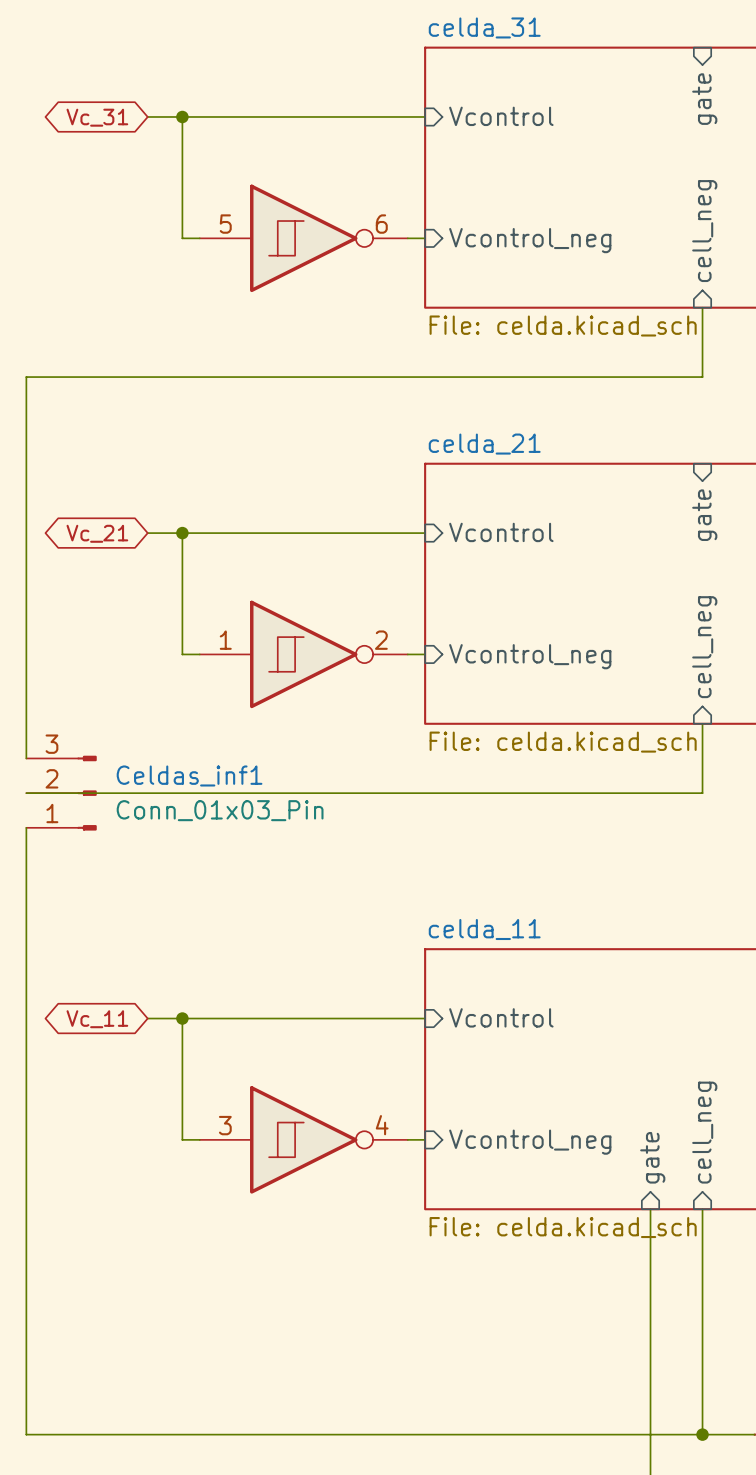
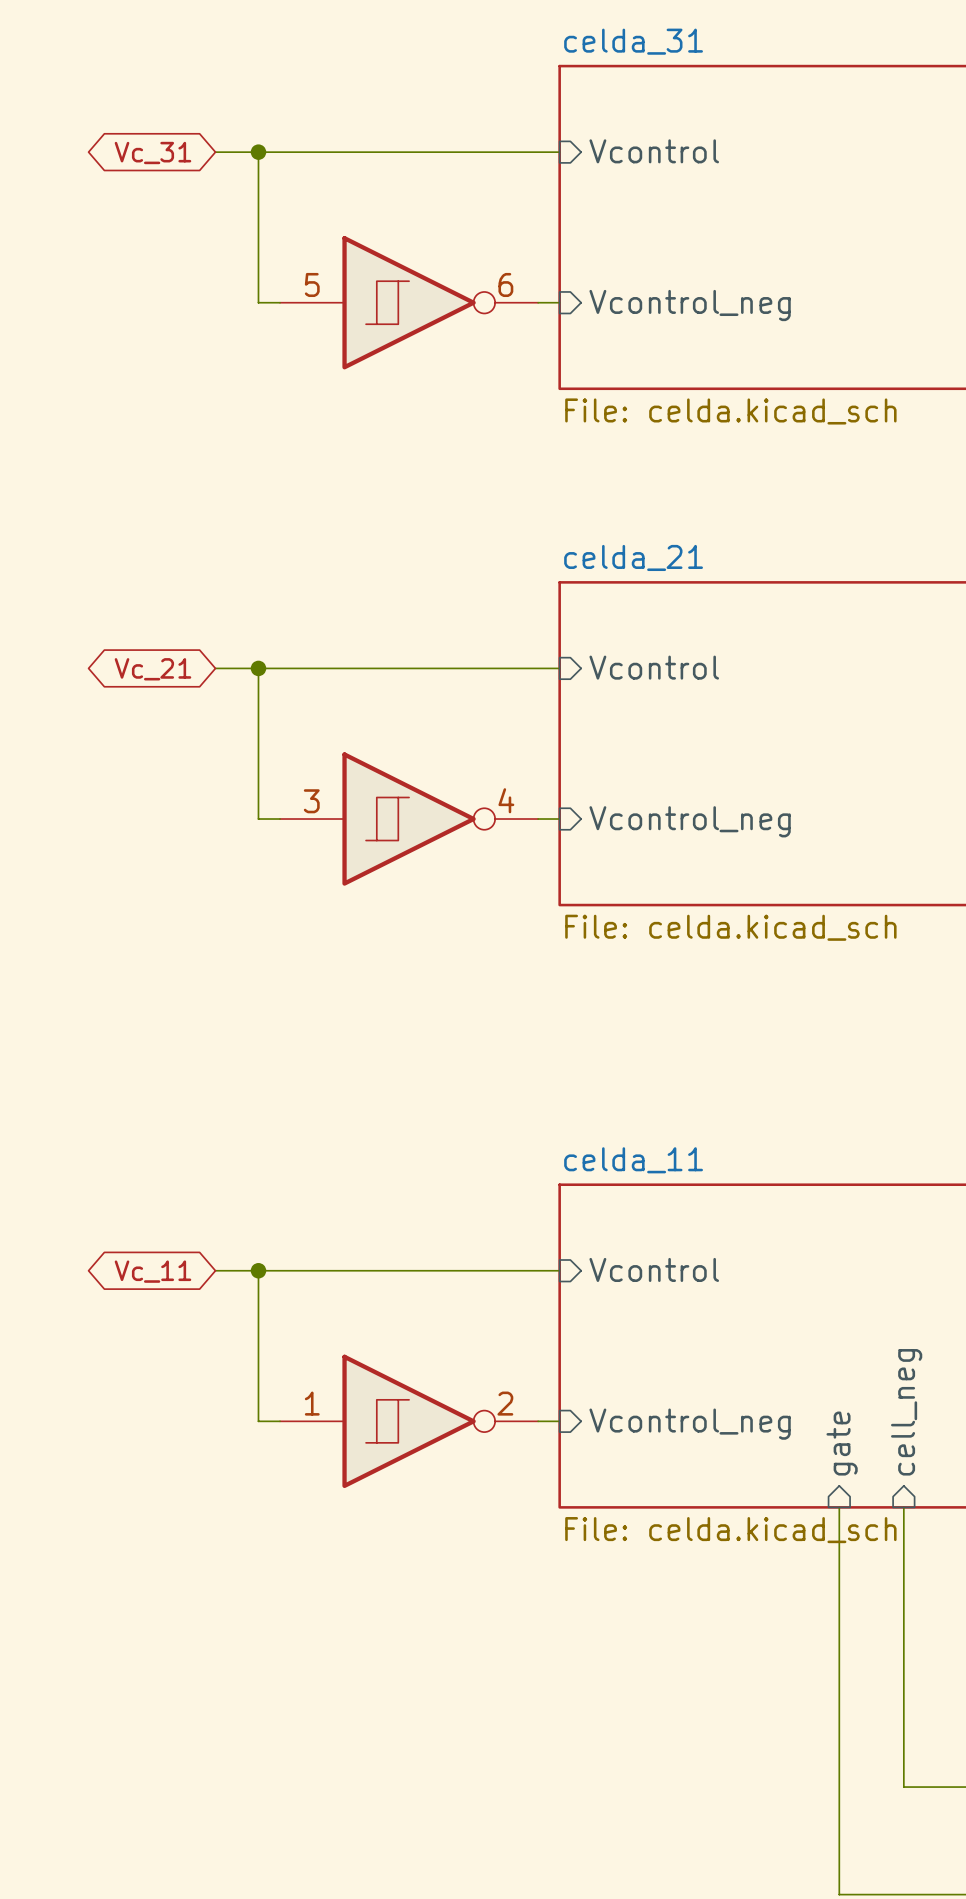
sheet pin: gate (704, 99) -> none
sheet pin: cell_neg (704, 231) -> none
wire: (702, 307) (702, 377) (26, 377) (26, 758) -> none
sheet pin: gate (704, 515) -> none
part pin number: 1 (225, 640) -> 3 (311, 801)
part pin number: 2 (381, 640) -> 4 (506, 800)
sheet pin: cell_neg (704, 647) -> none
wire: (702, 723) (702, 793) (26, 793) -> none
Celdas_inf1: Conn_01x03_Pin (61, 793) -> none
wire: (26, 827) (26, 1434) (702, 1434) -> none
part pin number: 3 (225, 1125) -> 1 (312, 1403)
part pin number: 4 (382, 1125) -> 2 (505, 1403)
junction: (702, 1434) -> none

